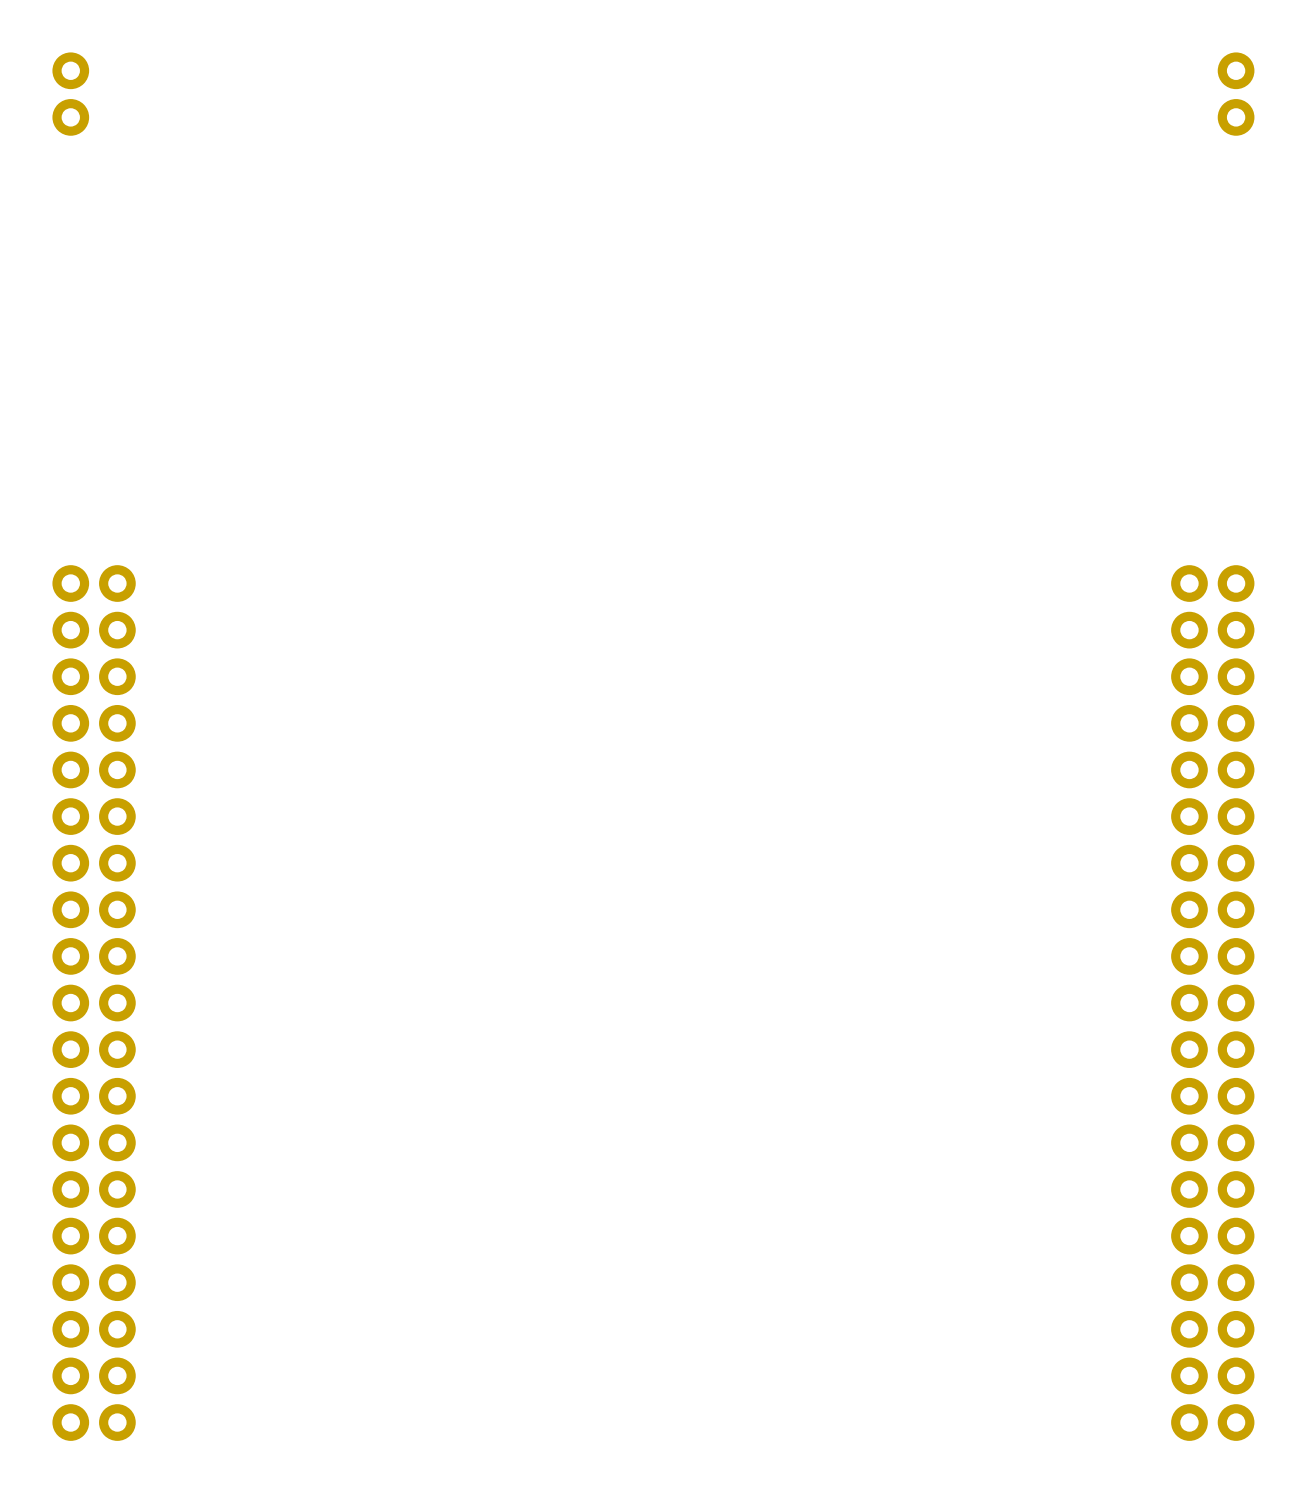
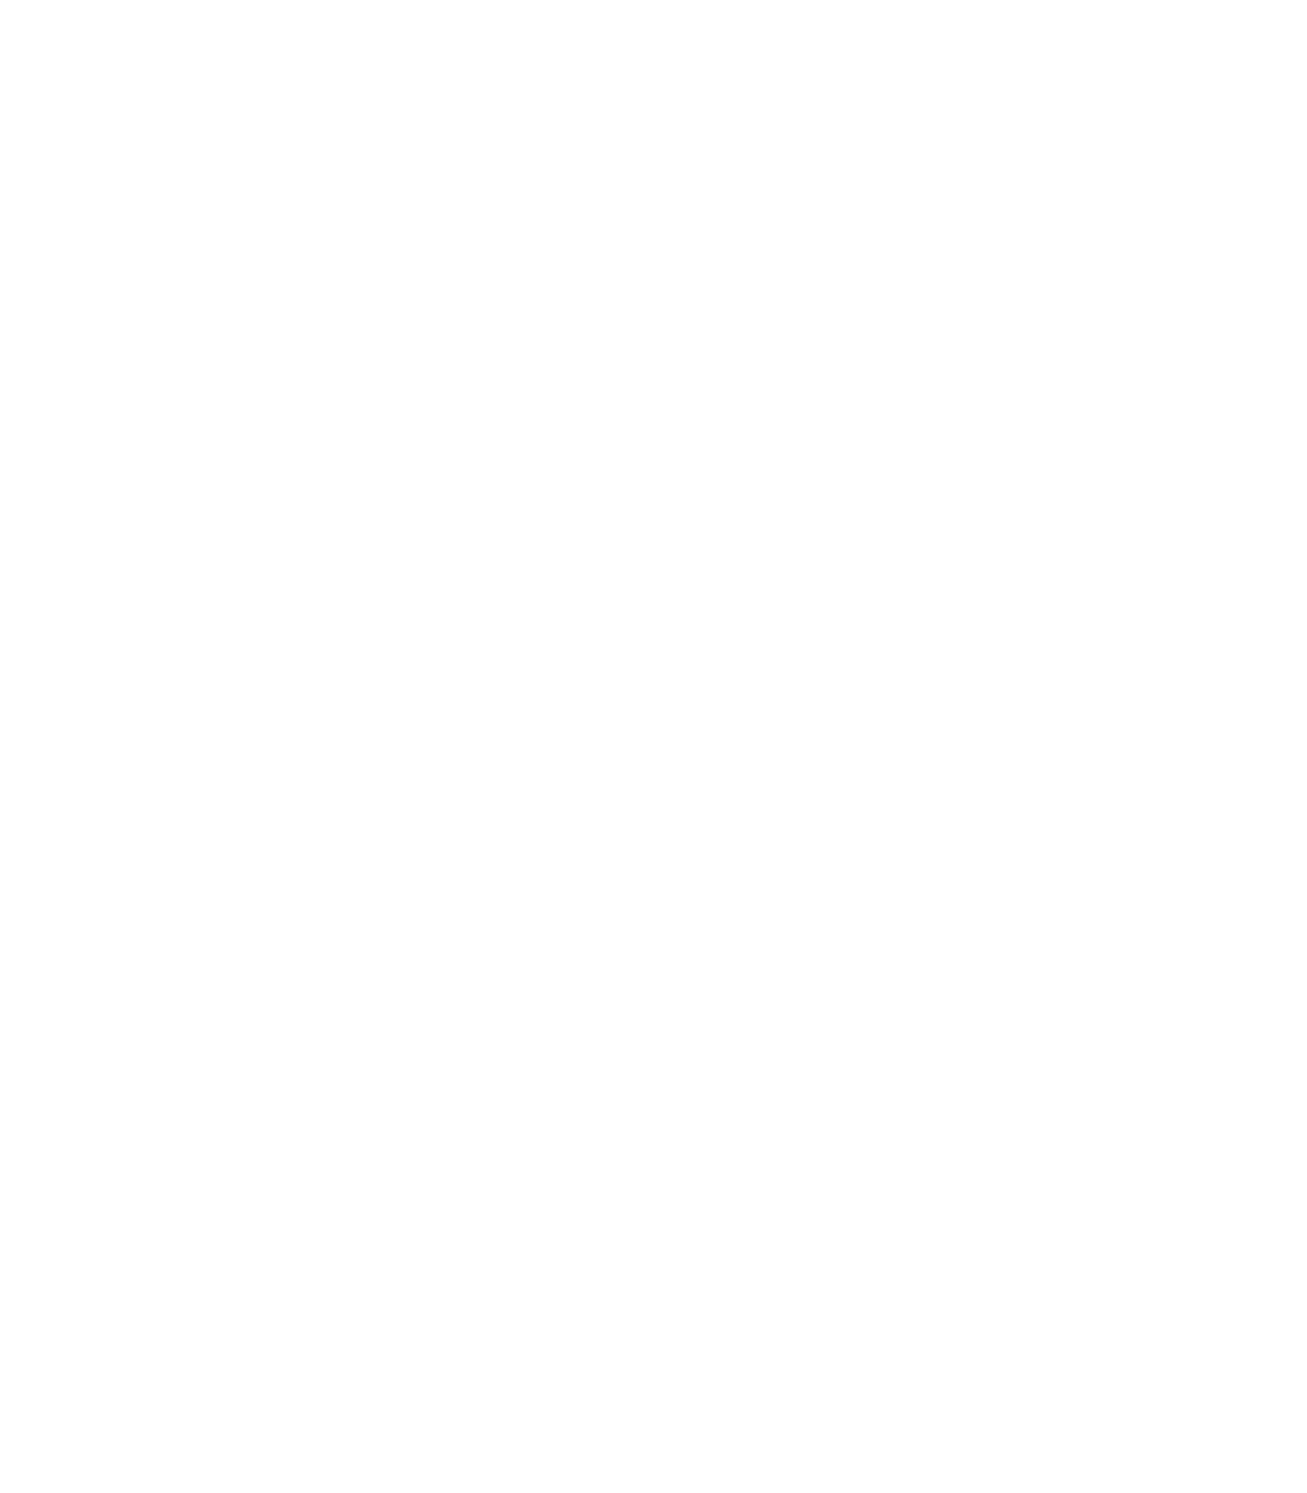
part: (70, 94) -> none
part: (1236, 94) -> none
part: (94, 1003) -> none
part: (1212, 1003) -> none

